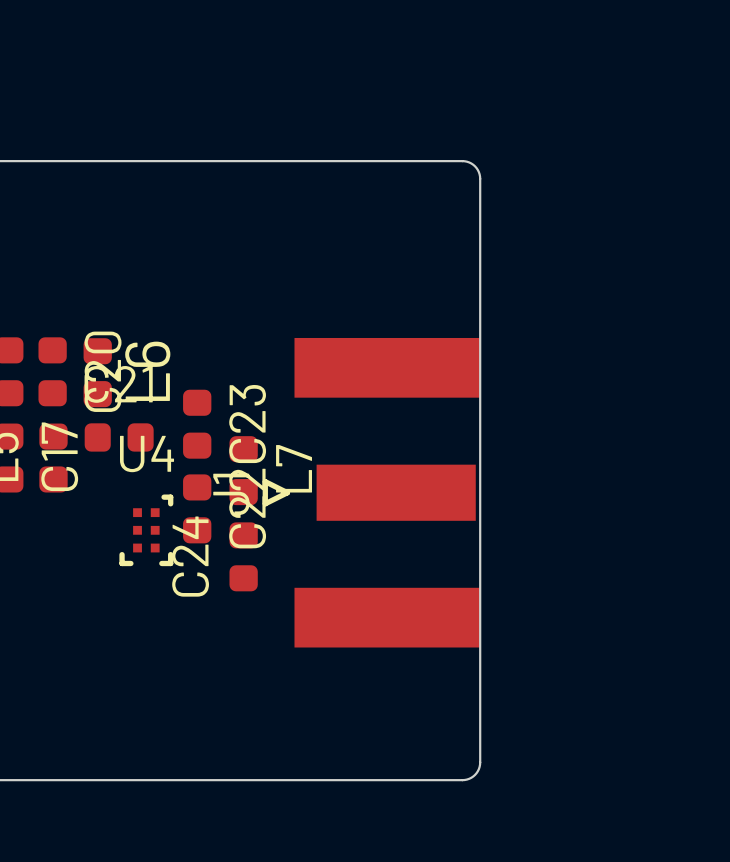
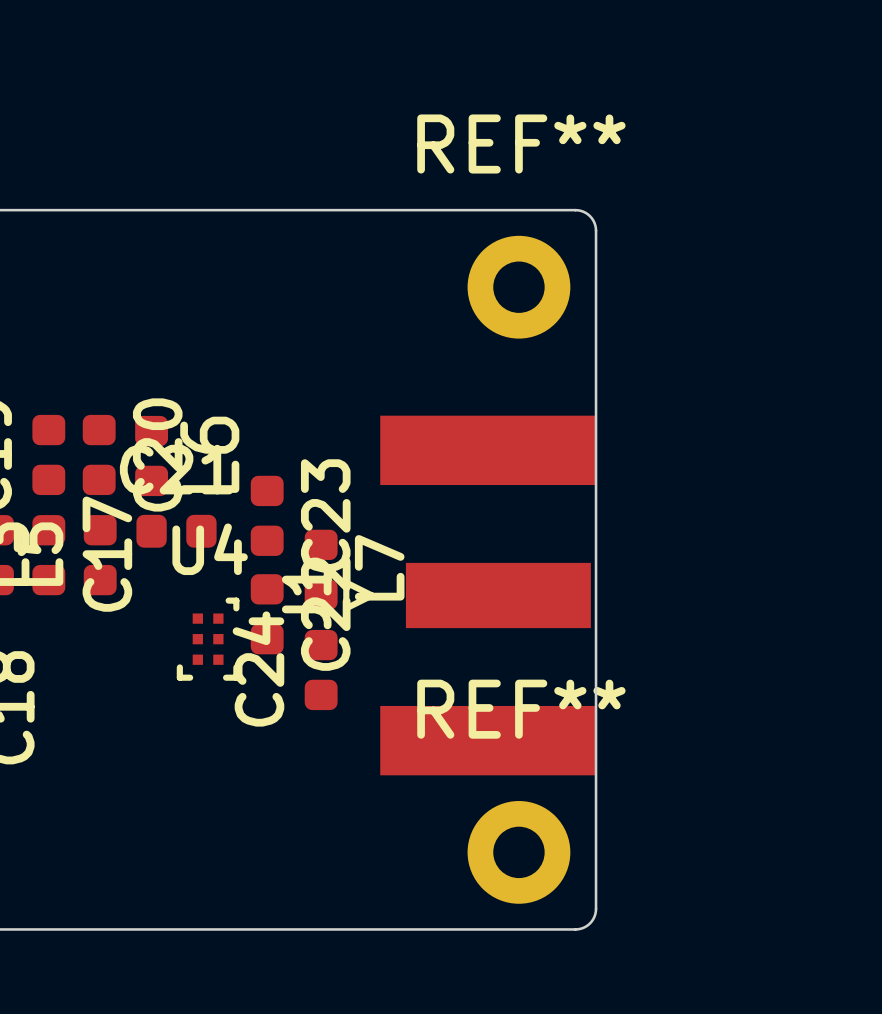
REF**: none -> (518, 287)
REF**: none -> (518, 852)

